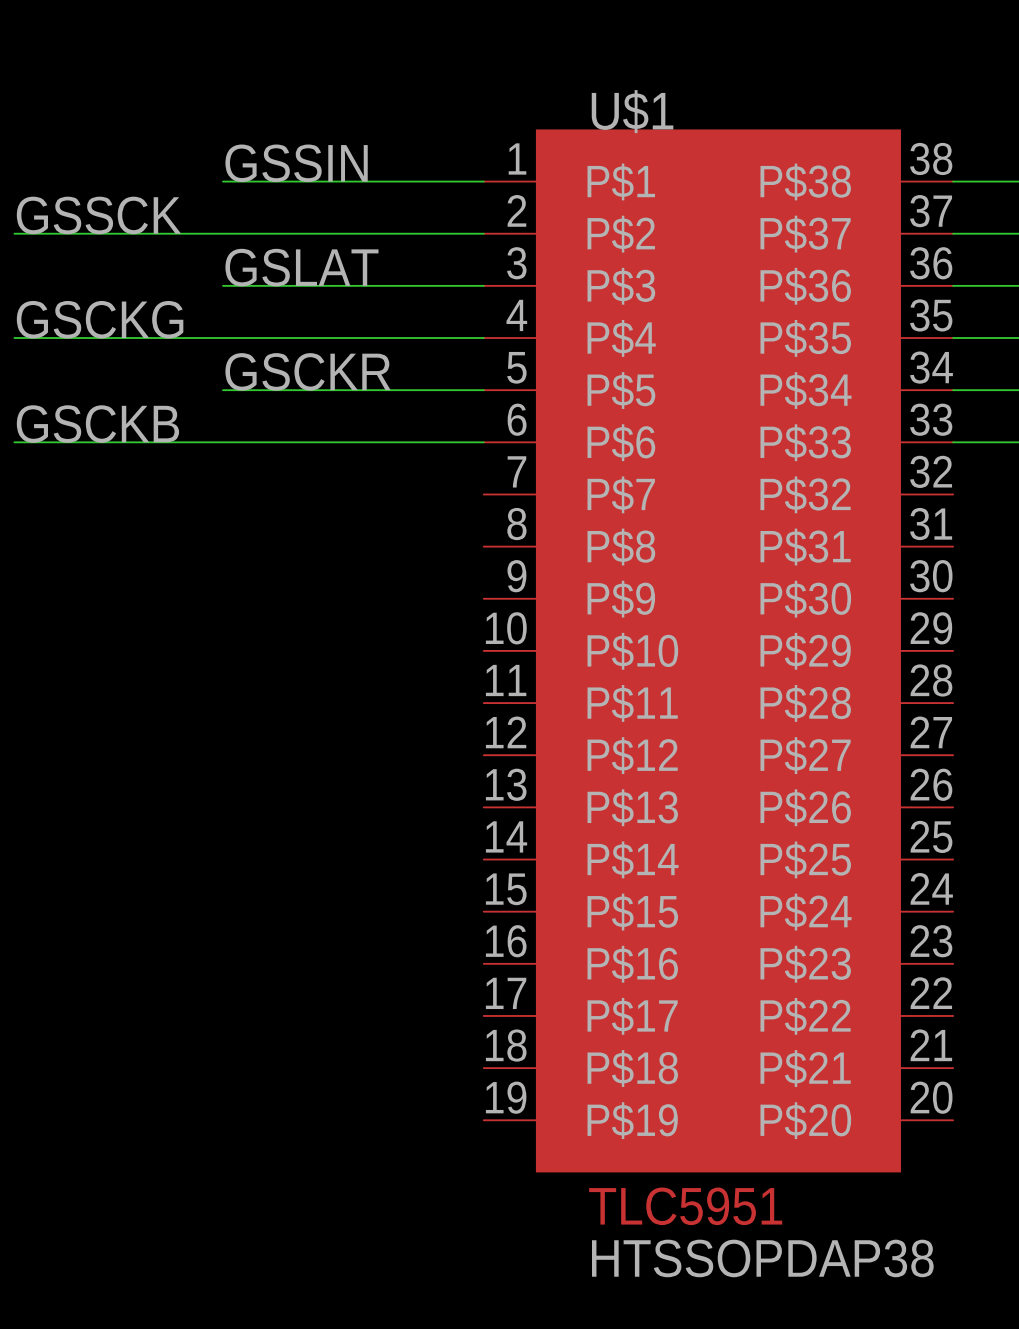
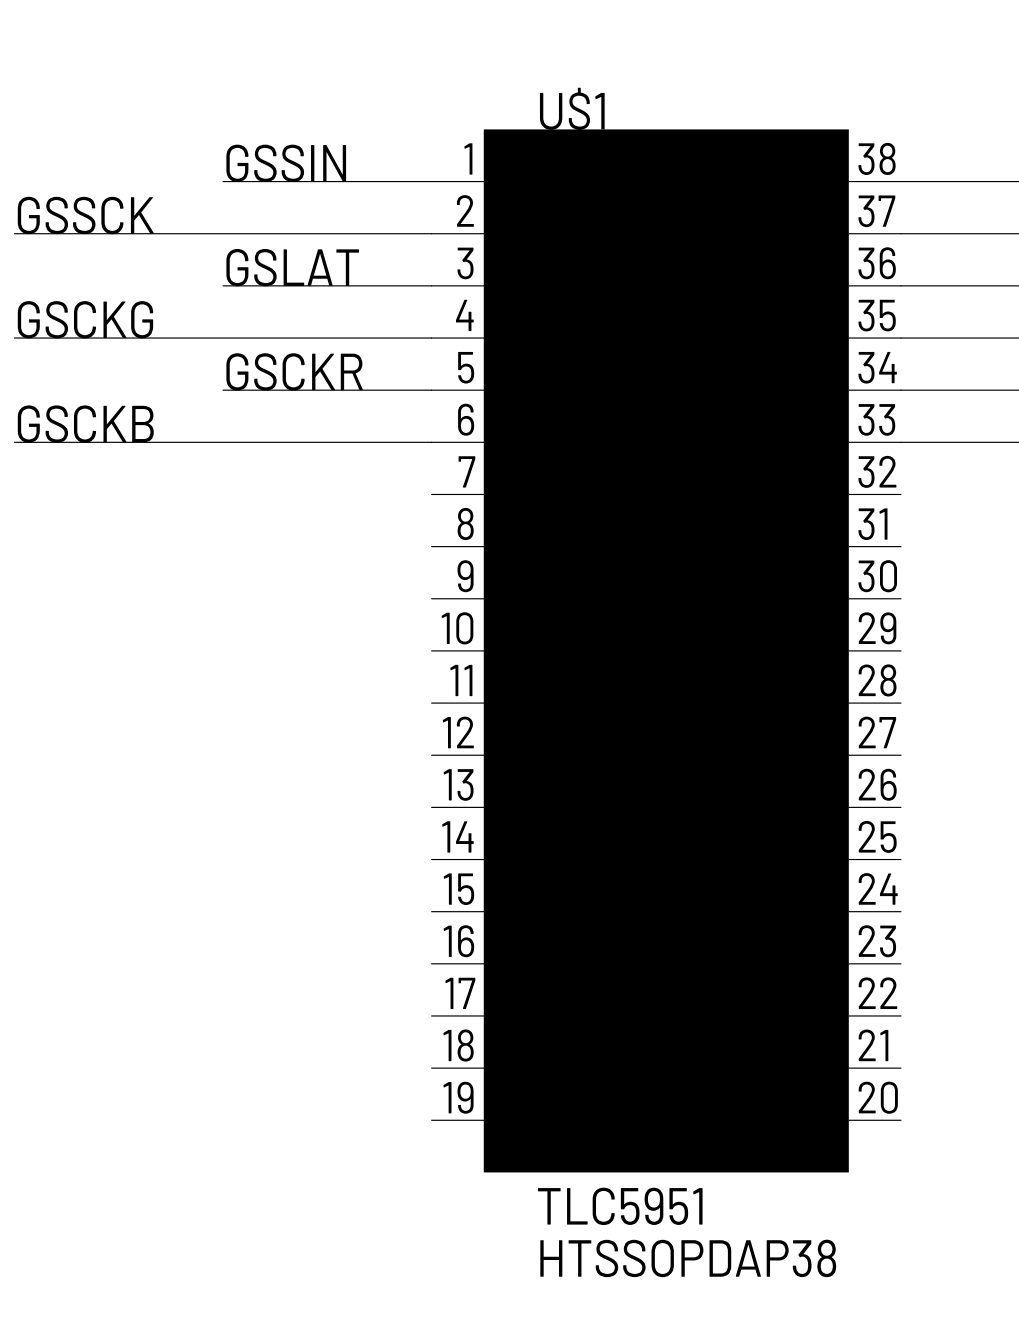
U$1 position: (718, 650) -> (666, 650)

